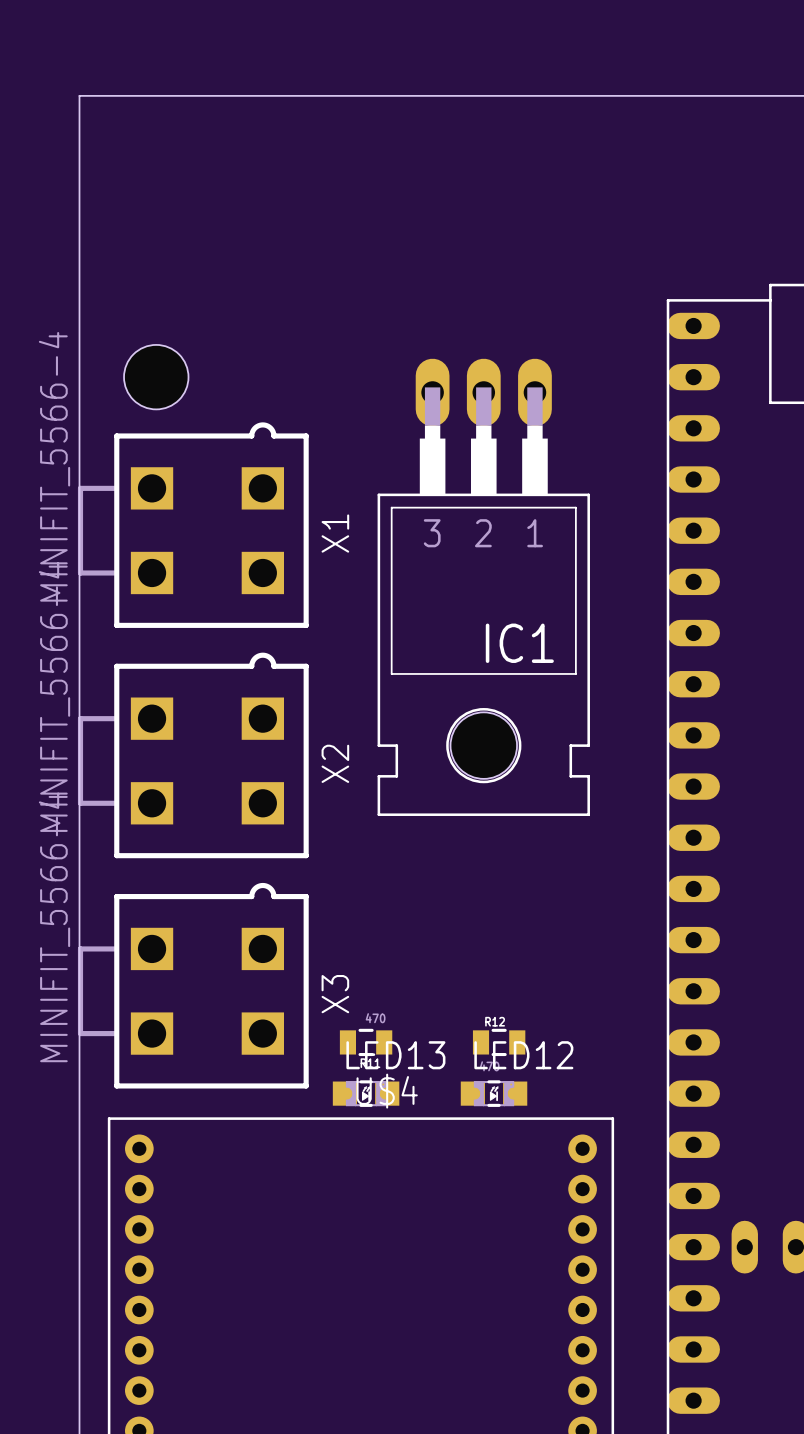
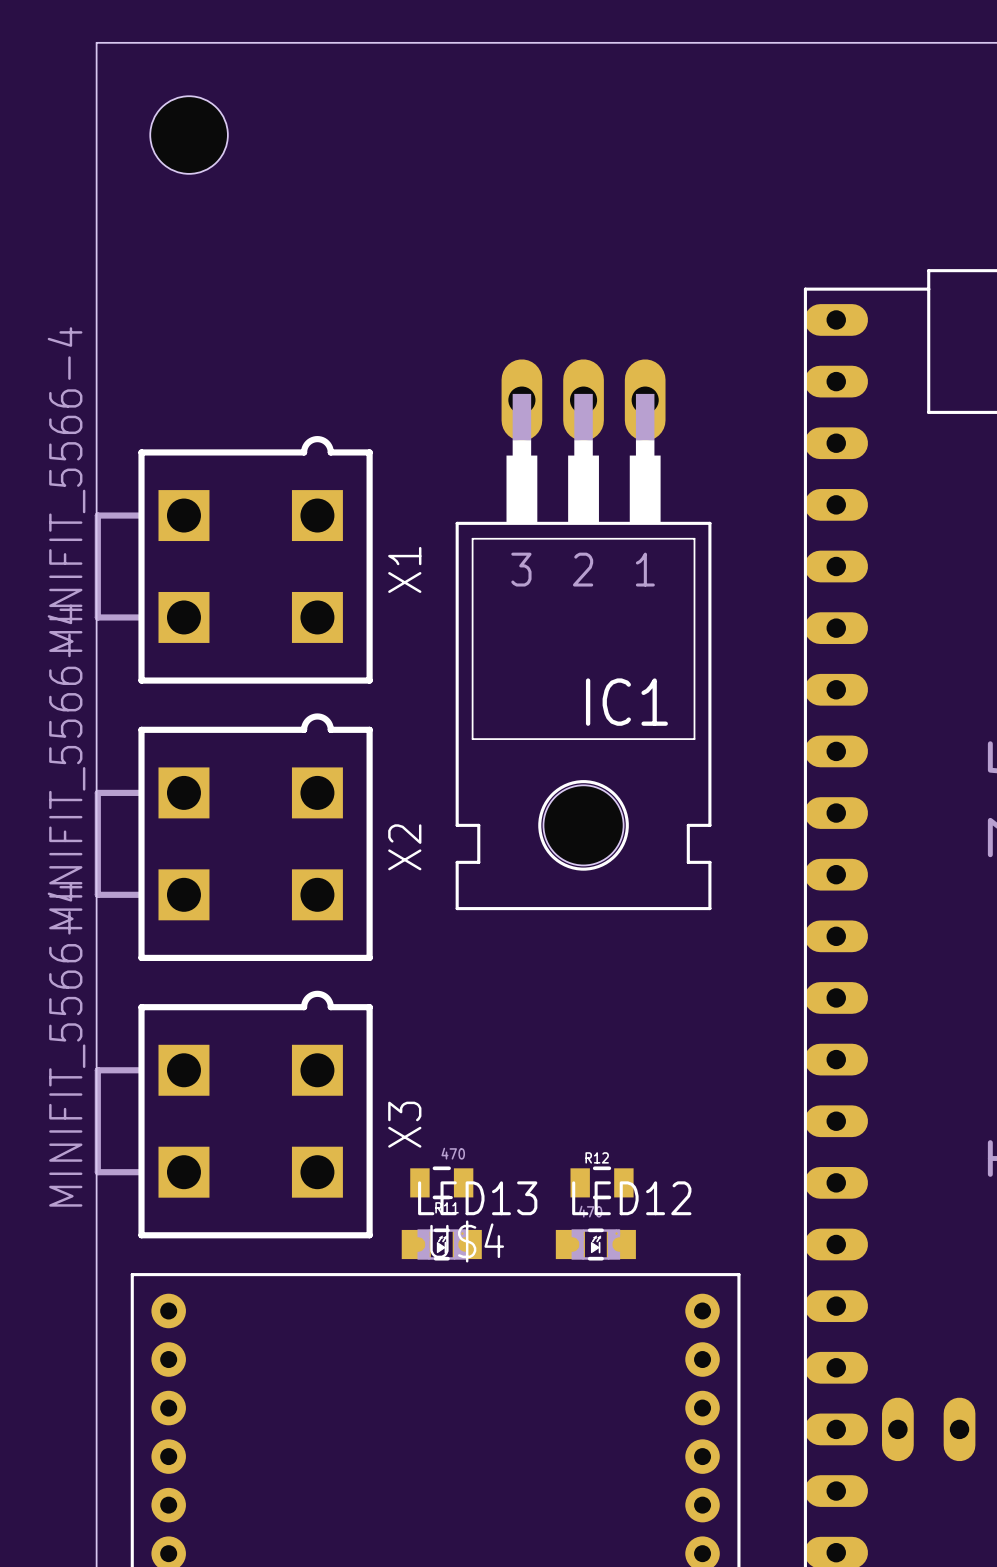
hole position: (156, 377) -> (189, 135)

